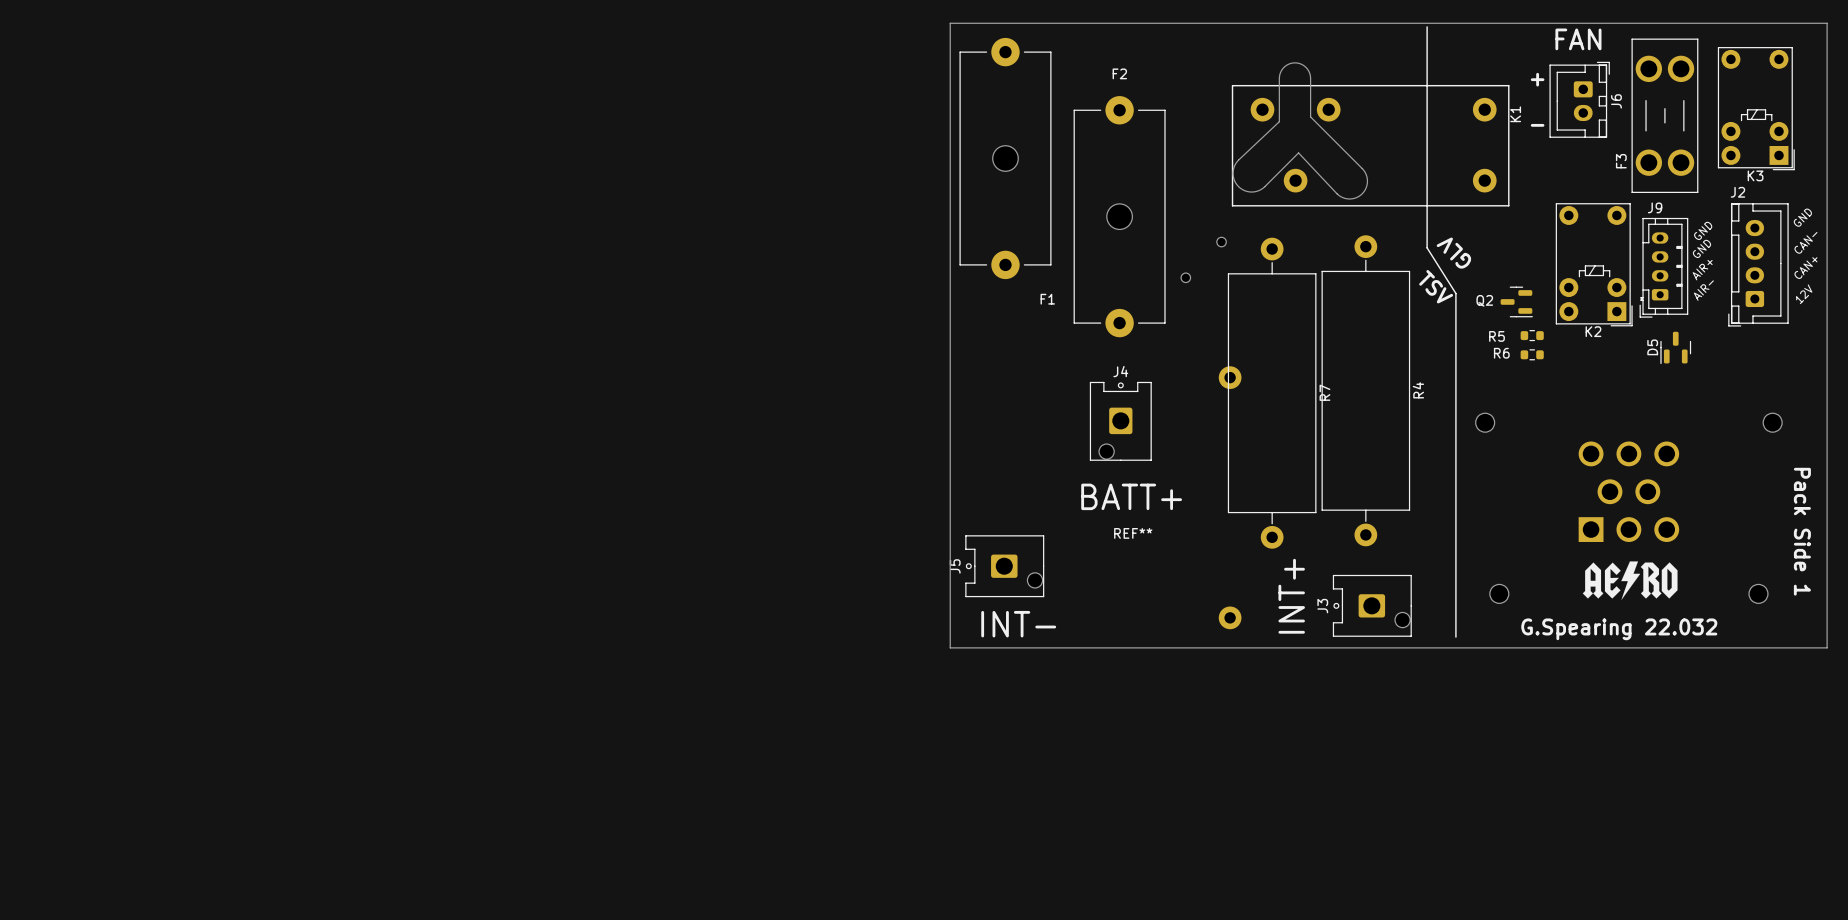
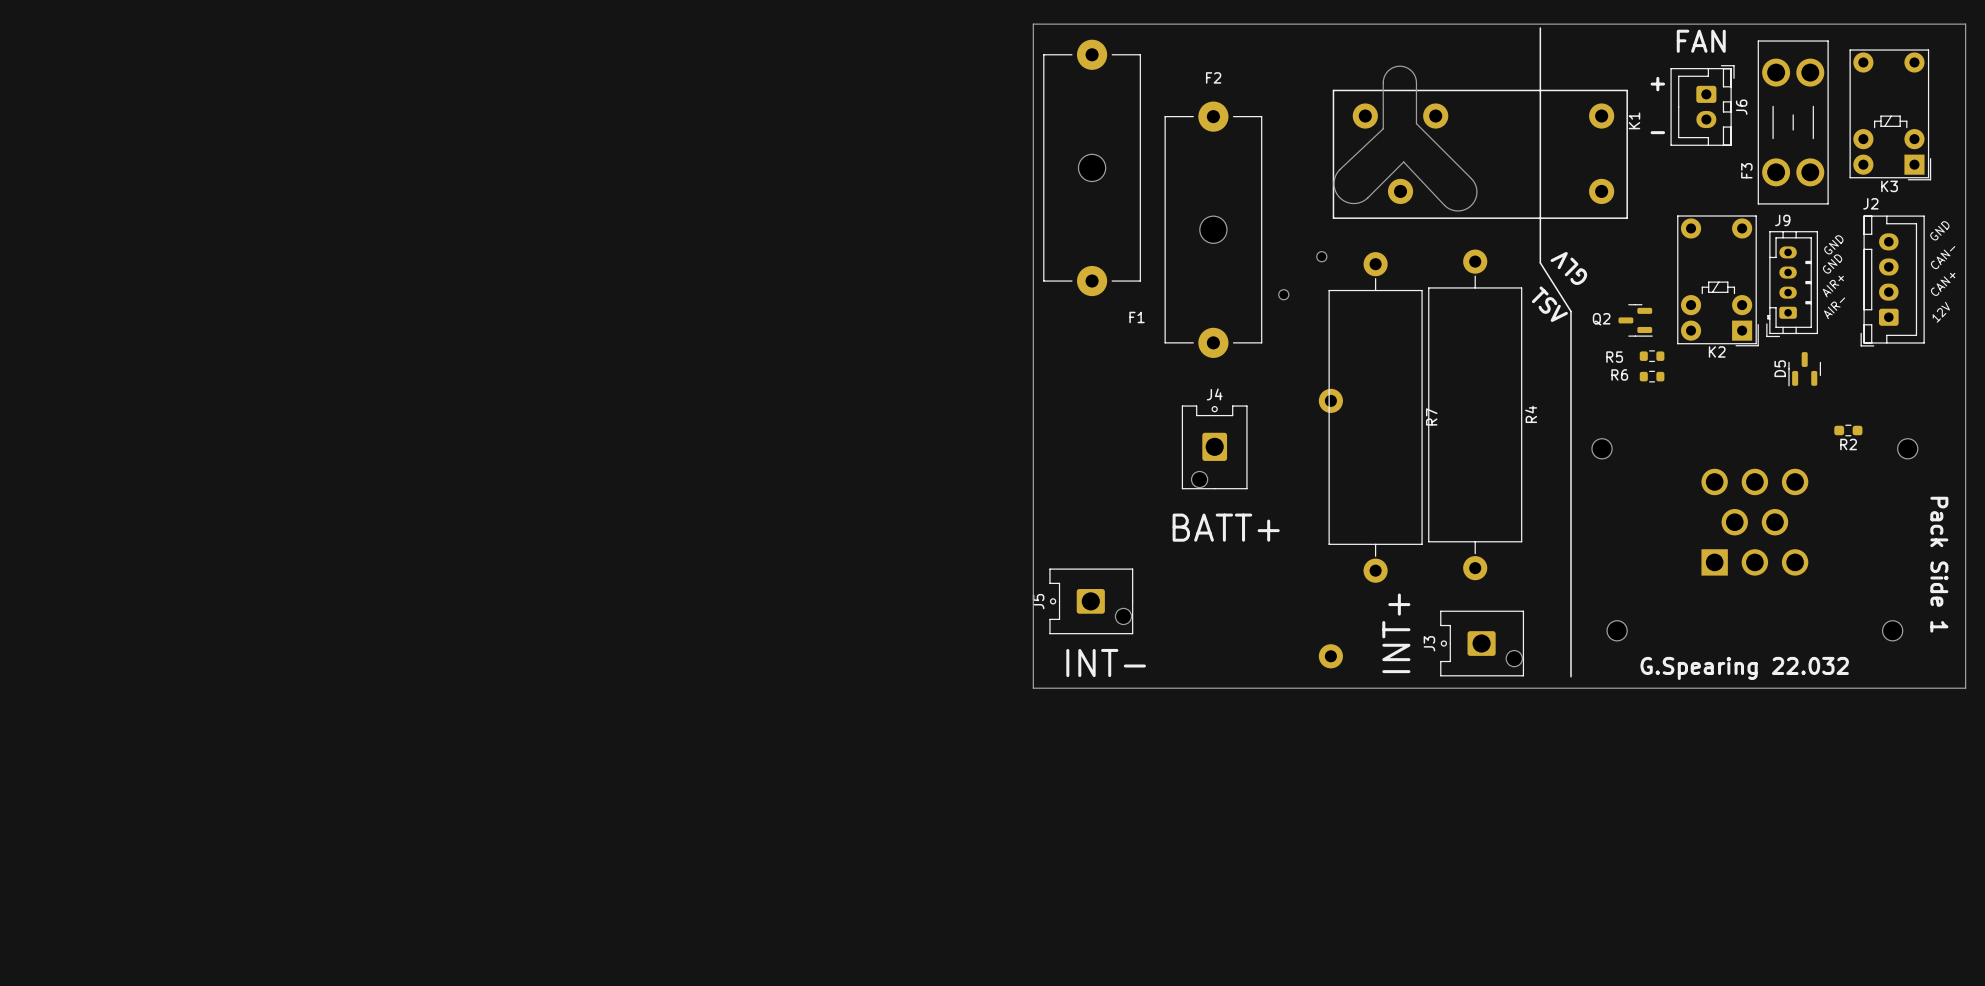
R2: none -> (1848, 430)
REF**: (1133, 533) -> none
drawing: [1582, 561, 1678, 600] -> none

